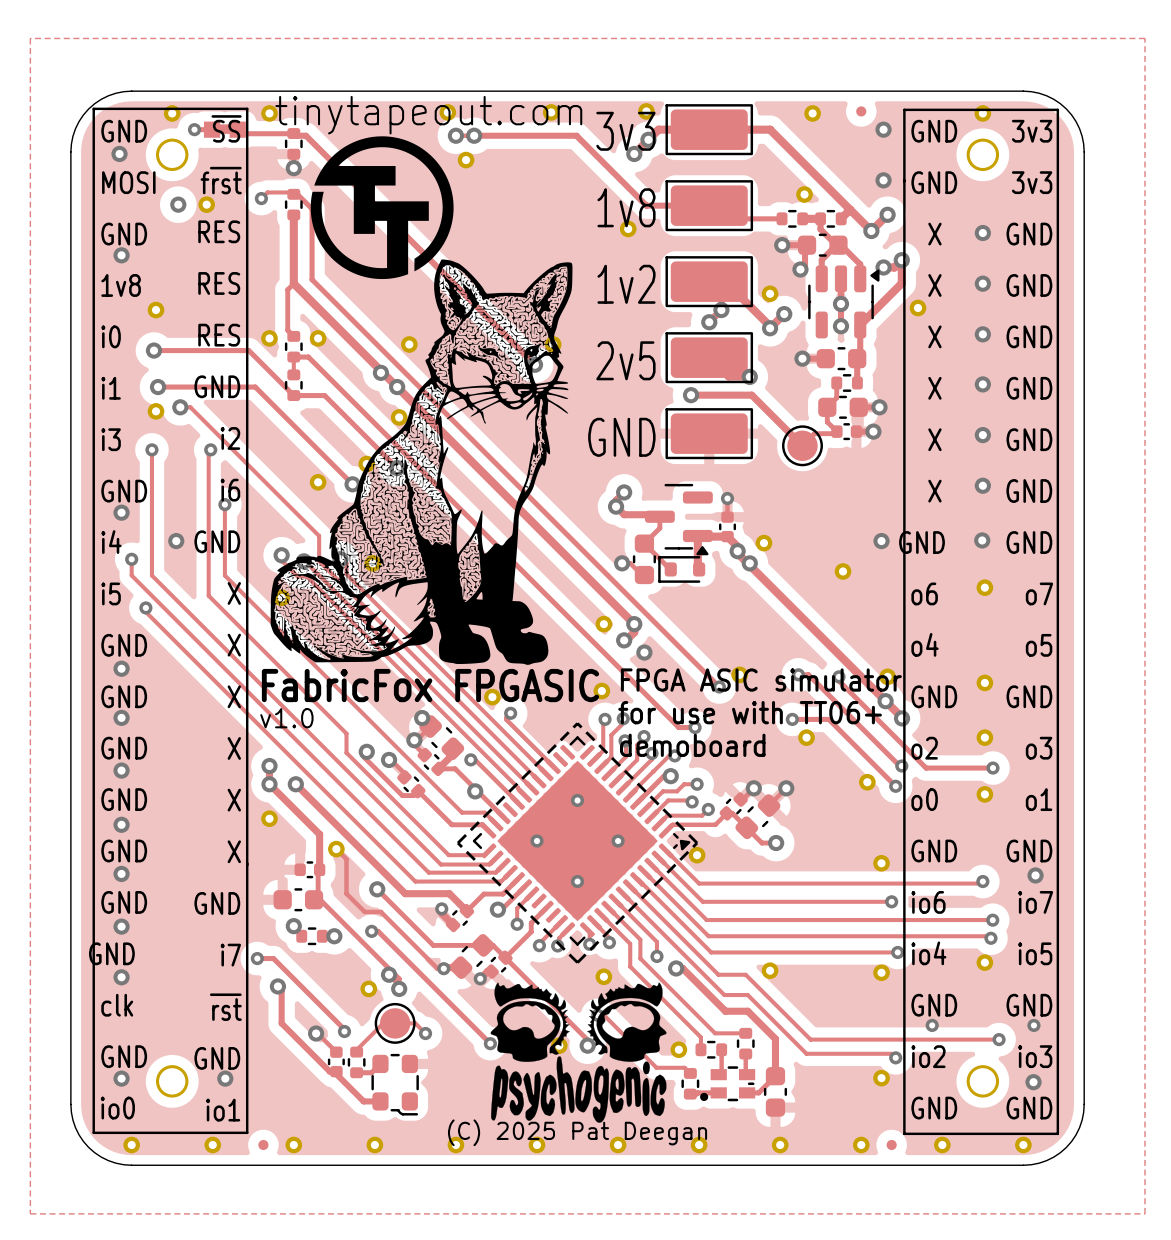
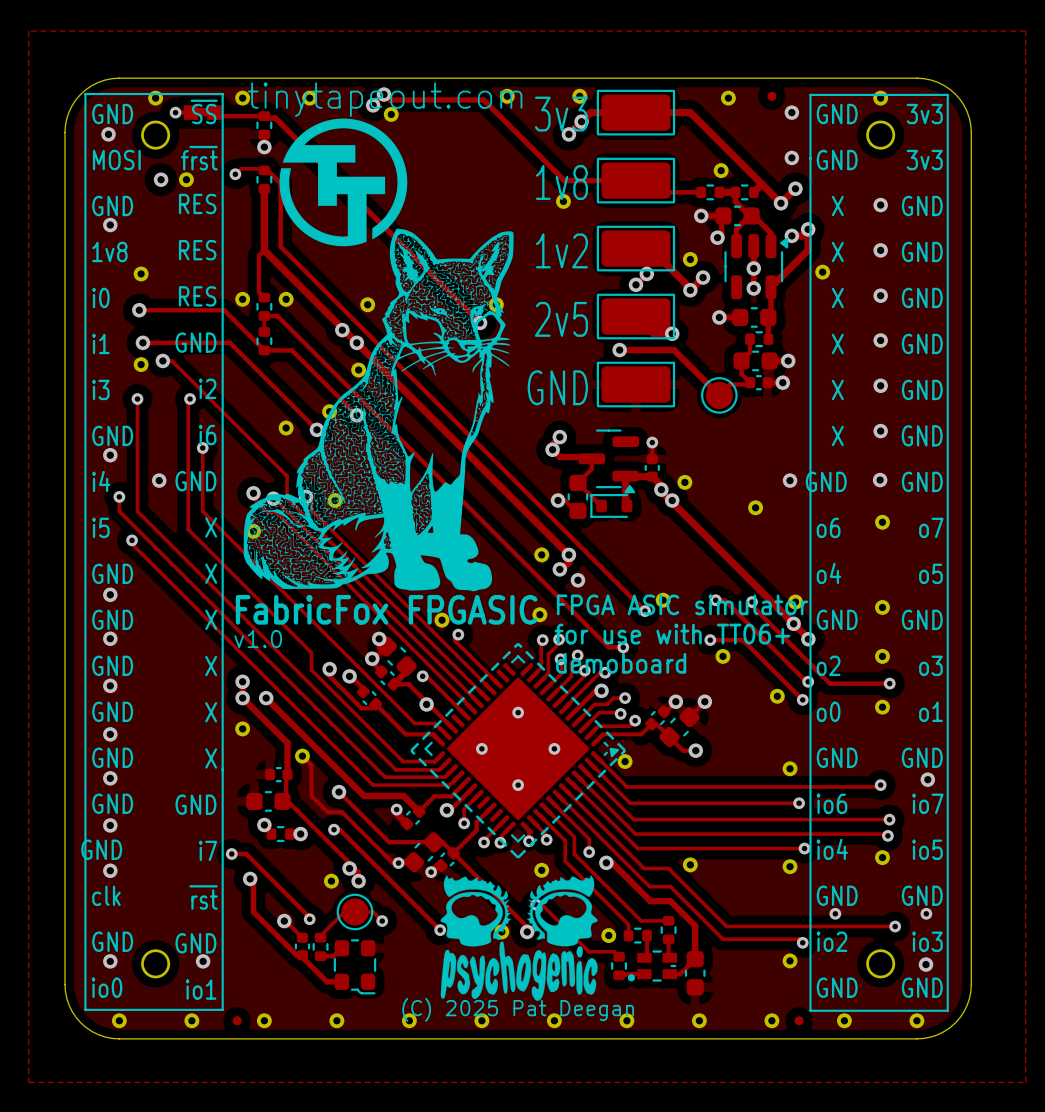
via: none -> (384, 94)
part: (447, 112) -> none
part position: (551, 112) -> (507, 96)
part: none -> (309, 98)
via: none -> (373, 105)
part: none -> (391, 114)
track: (455, 135) (576, 135) (646, 205) -> (373, 105) (384, 94) (389, 99) (483, 99) (564, 180) (579, 180)
via: (455, 135) -> none
via: (474, 135) -> none
part: (466, 160) -> none

